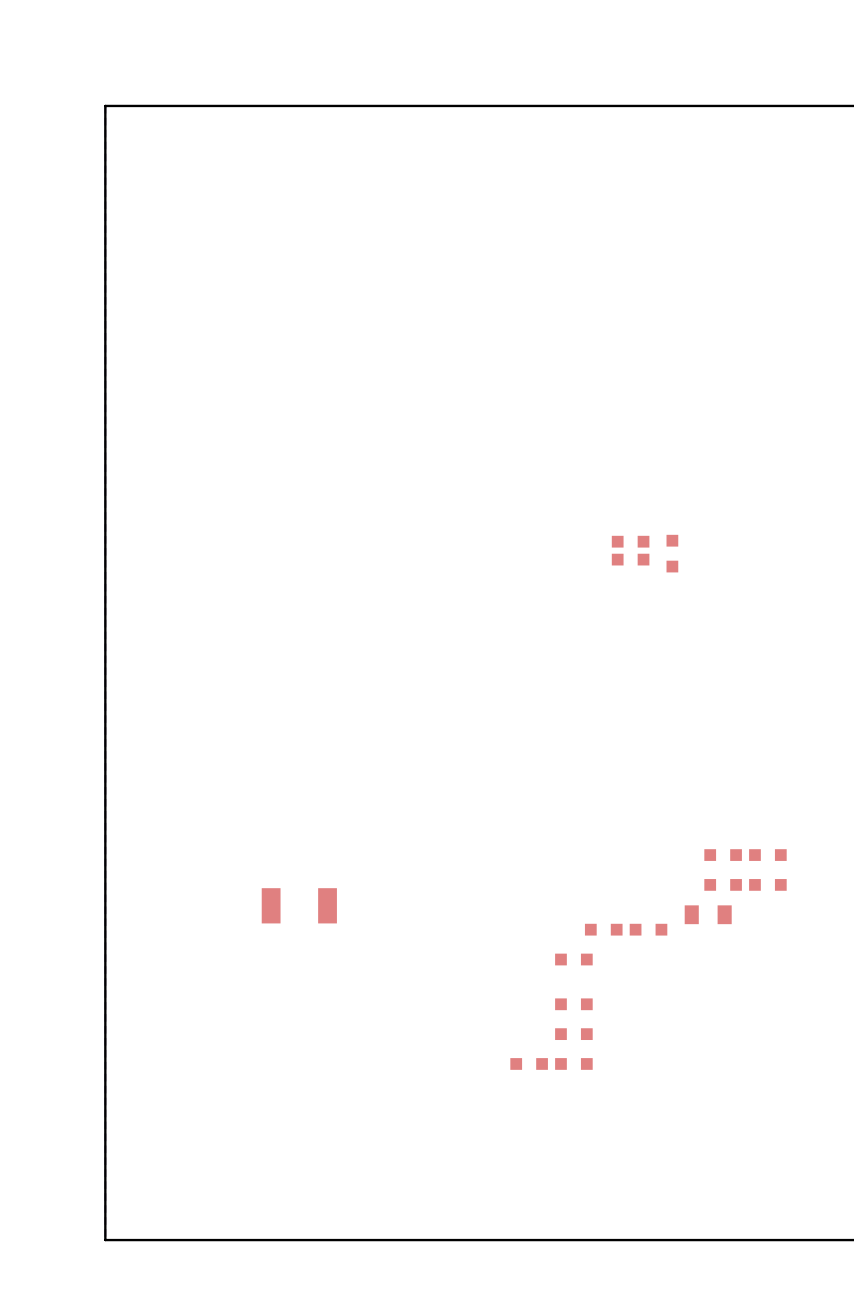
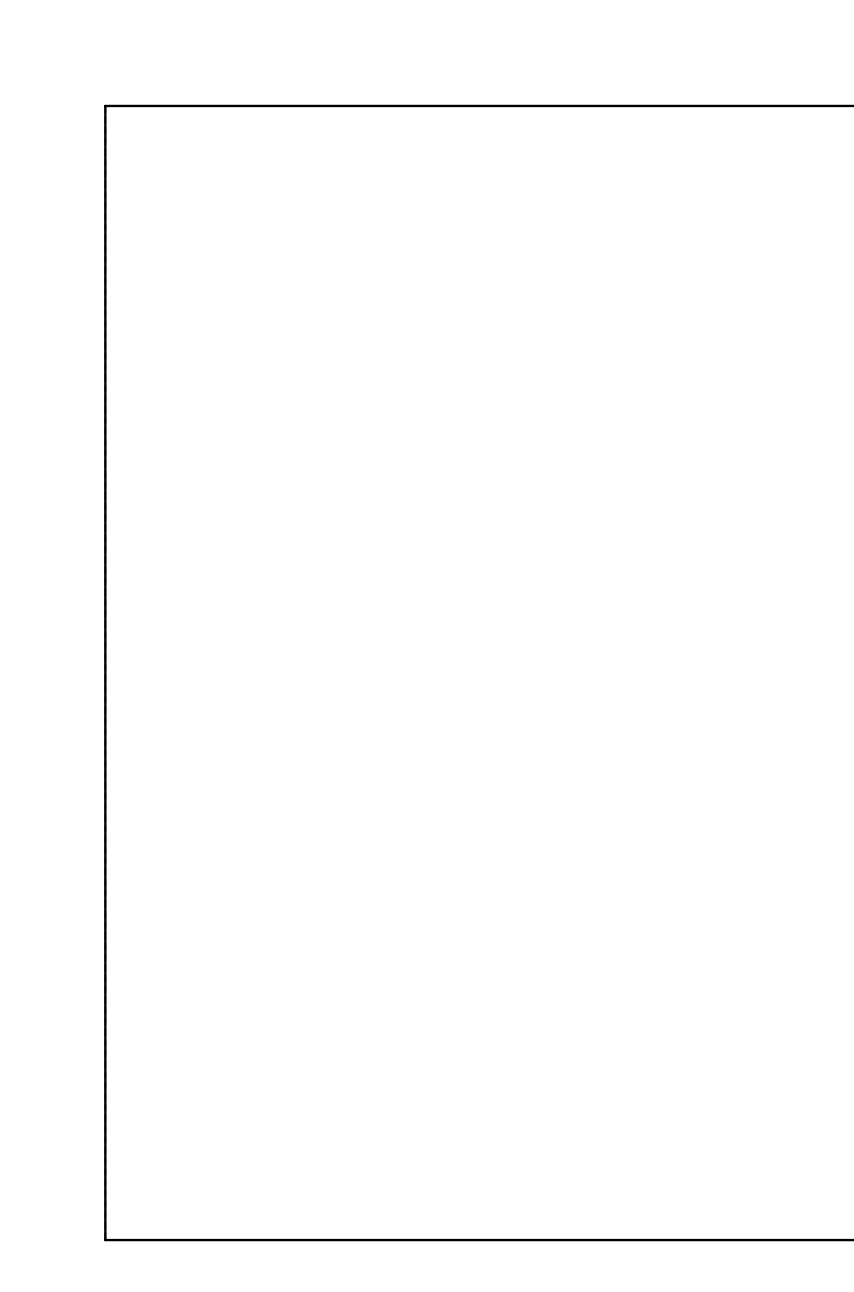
part: (630, 541) -> none
part: (672, 553) -> none
part: (630, 559) -> none
part: (723, 855) -> none
part: (767, 855) -> none
part: (723, 884) -> none
part: (767, 884) -> none
part: (299, 905) -> none
part: (708, 914) -> none
part: (603, 929) -> none
part: (648, 929) -> none
part: (573, 959) -> none
part: (573, 1004) -> none
part: (573, 1034) -> none
part: (529, 1063) -> none
part: (573, 1063) -> none

